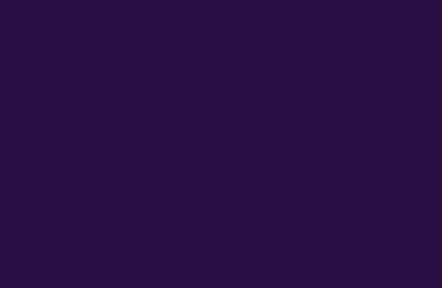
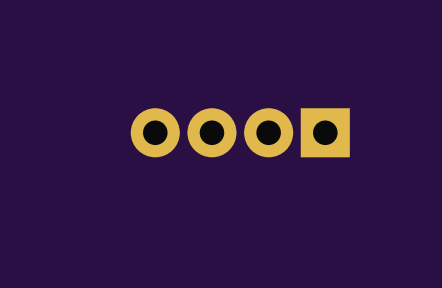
part: none -> (240, 132)

